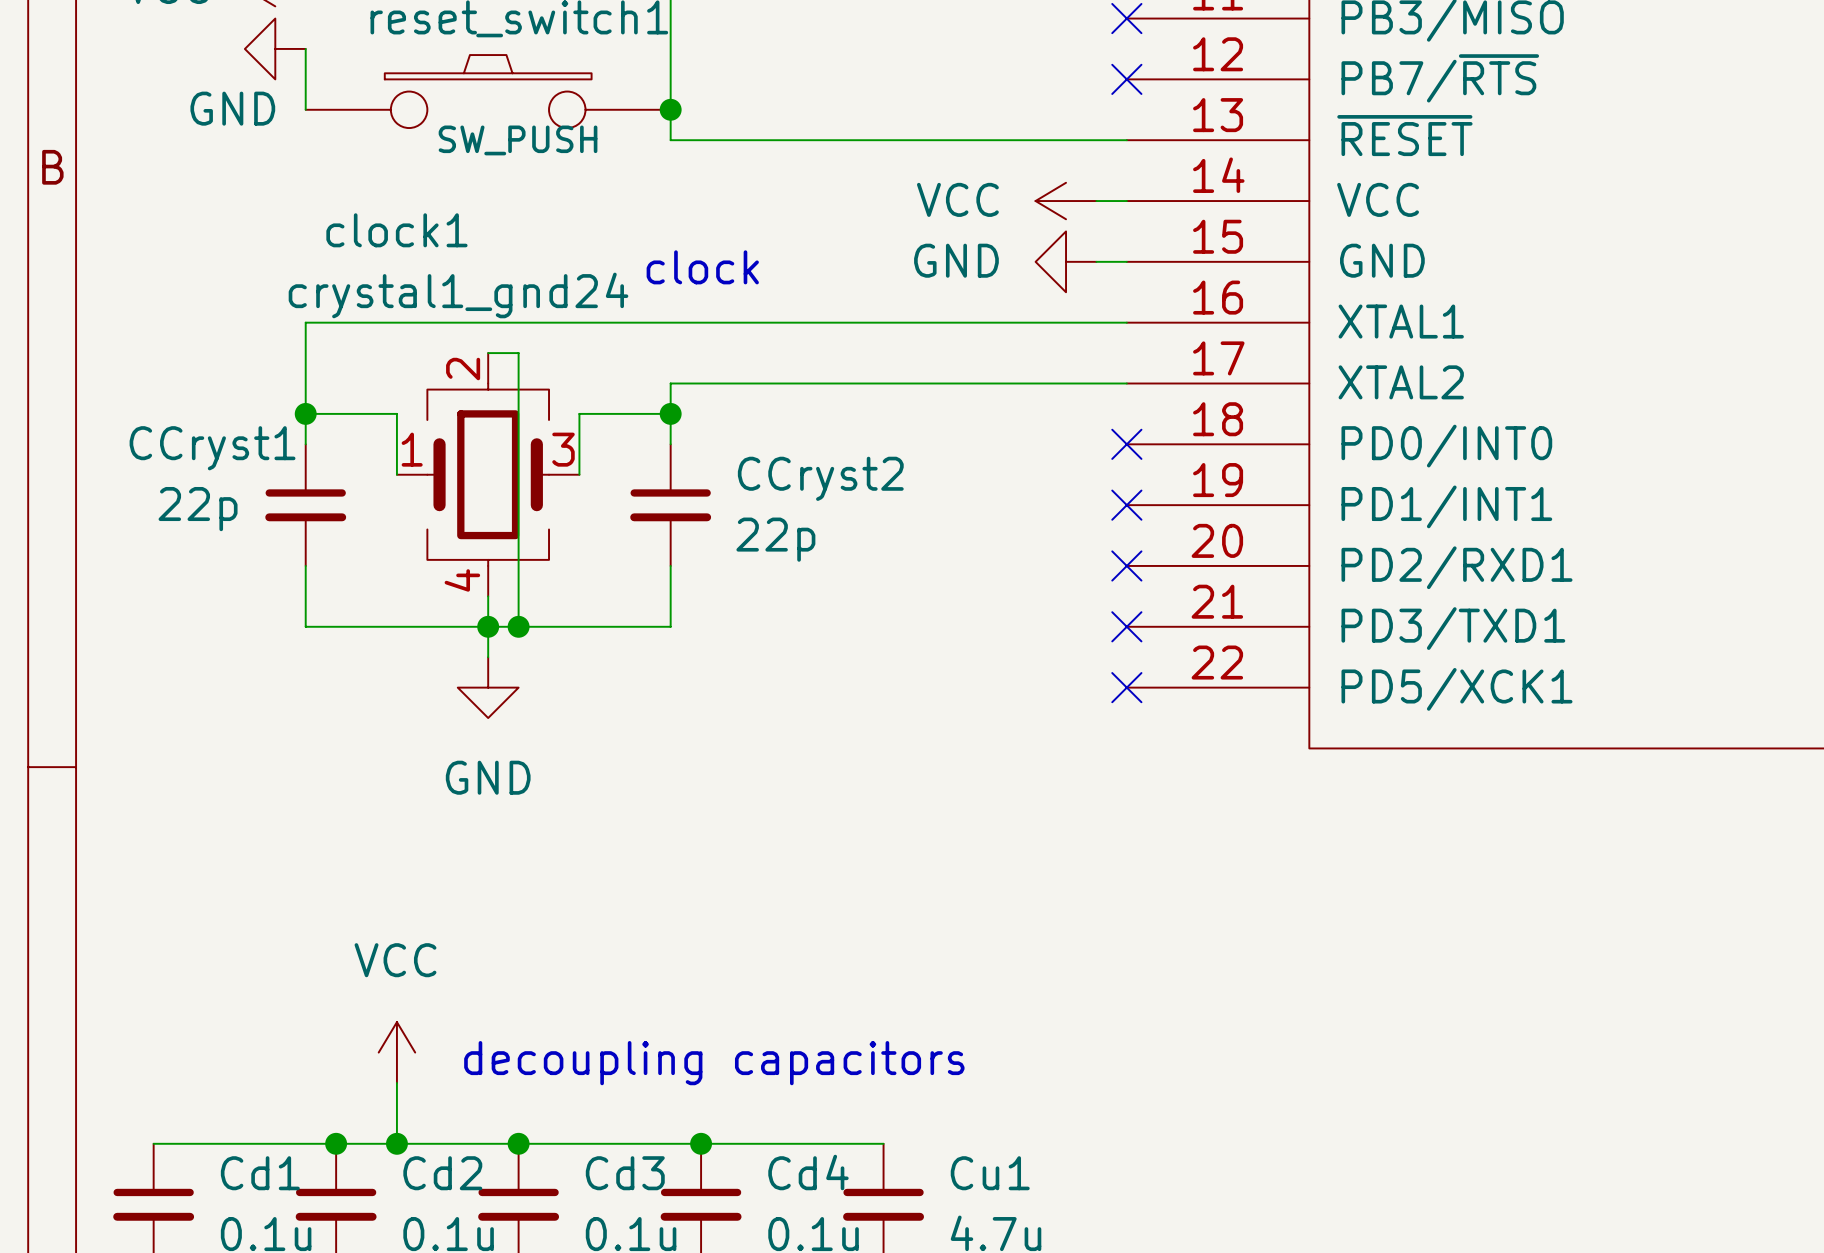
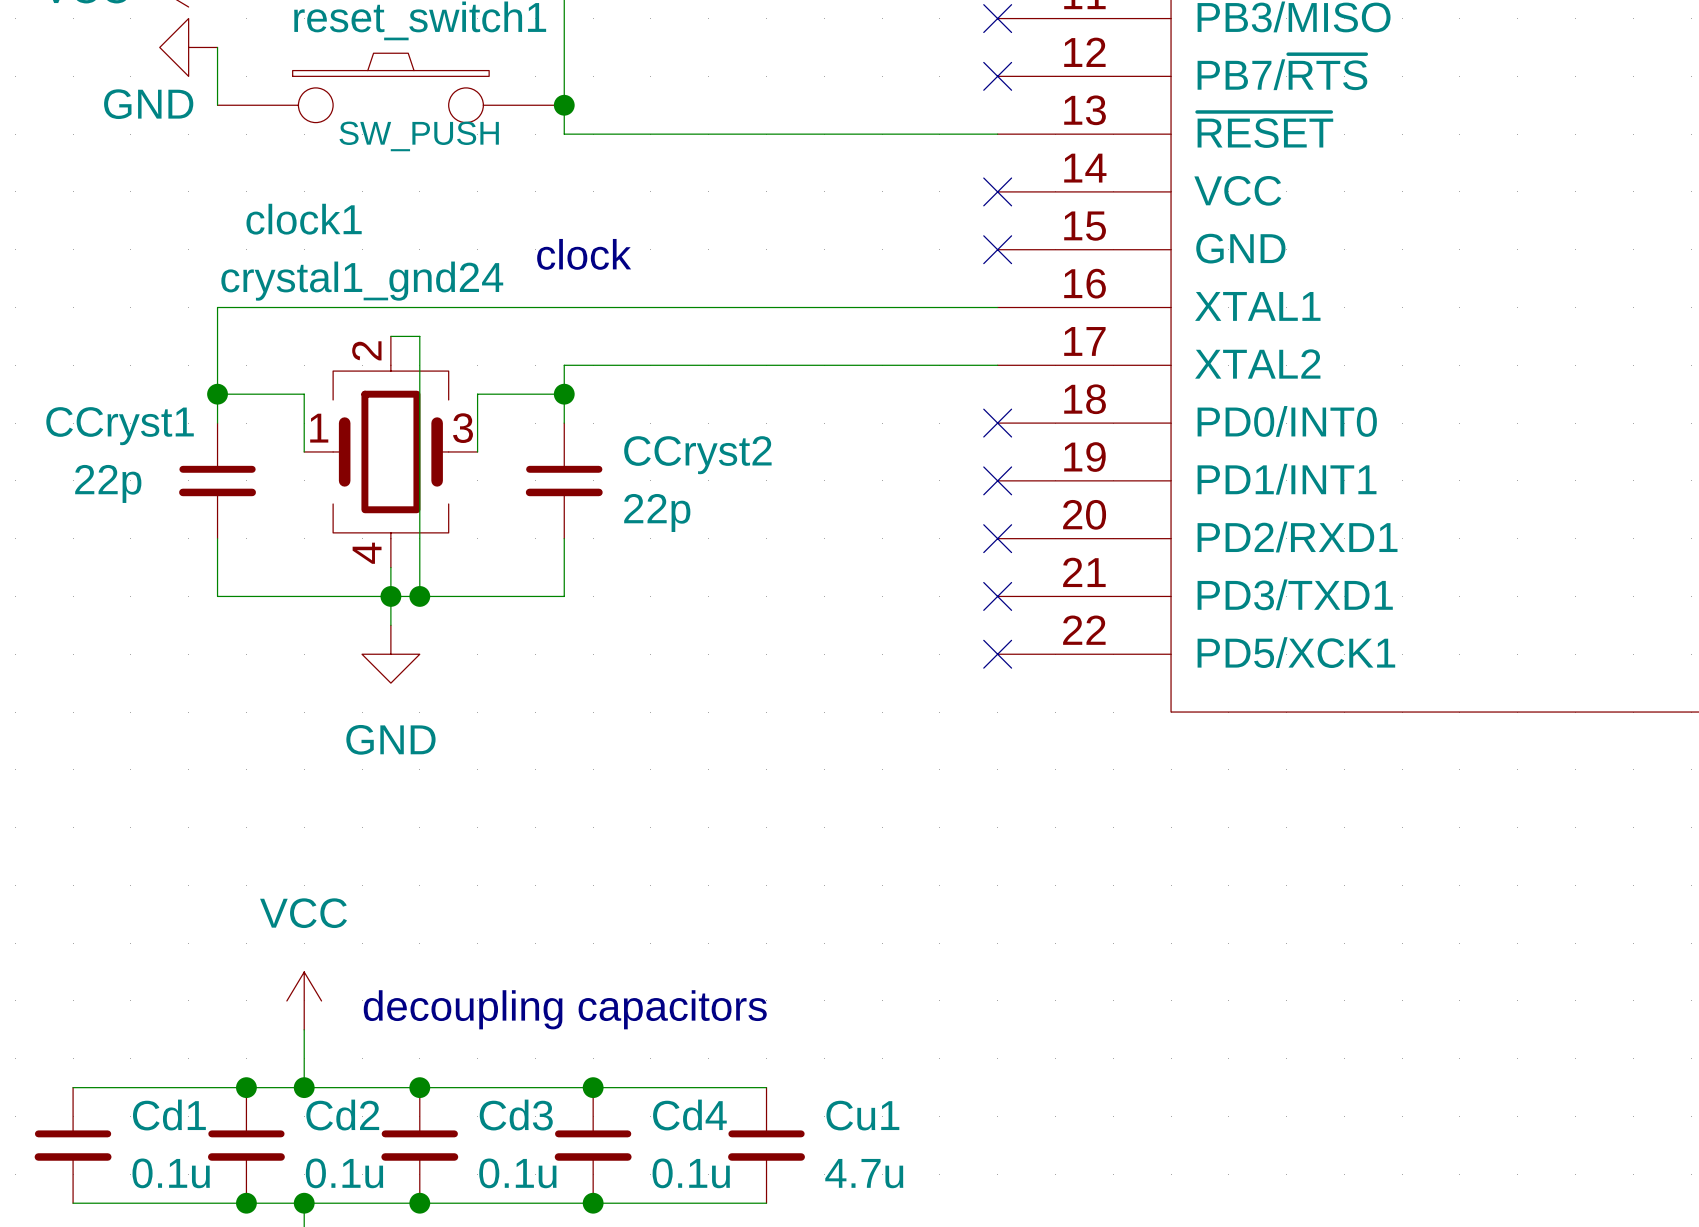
power symbol: VCC (1066, 201) -> none
wire: (1096, 201) (1126, 201) -> none
no-connect mark: none -> (997, 191)
power symbol: GND (1066, 261) -> none
wire: (1096, 261) (1126, 261) -> none
no-connect mark: none -> (997, 249)

